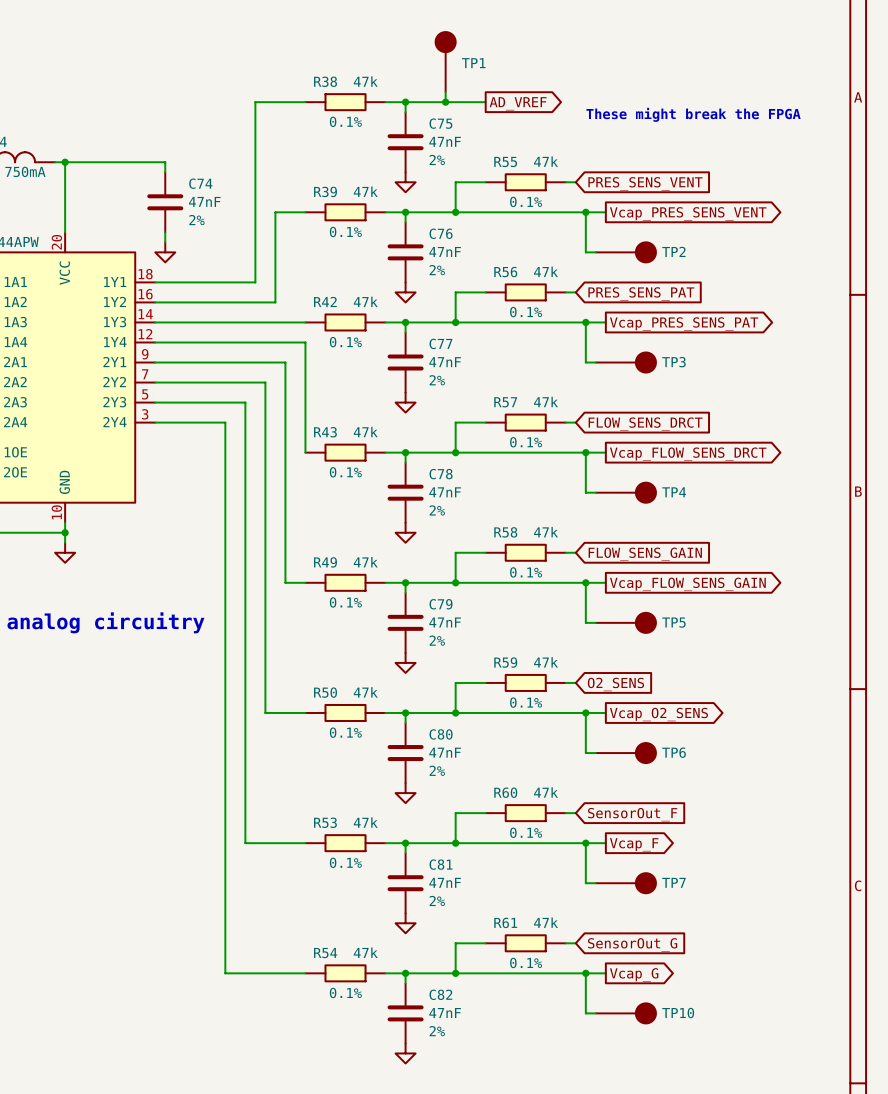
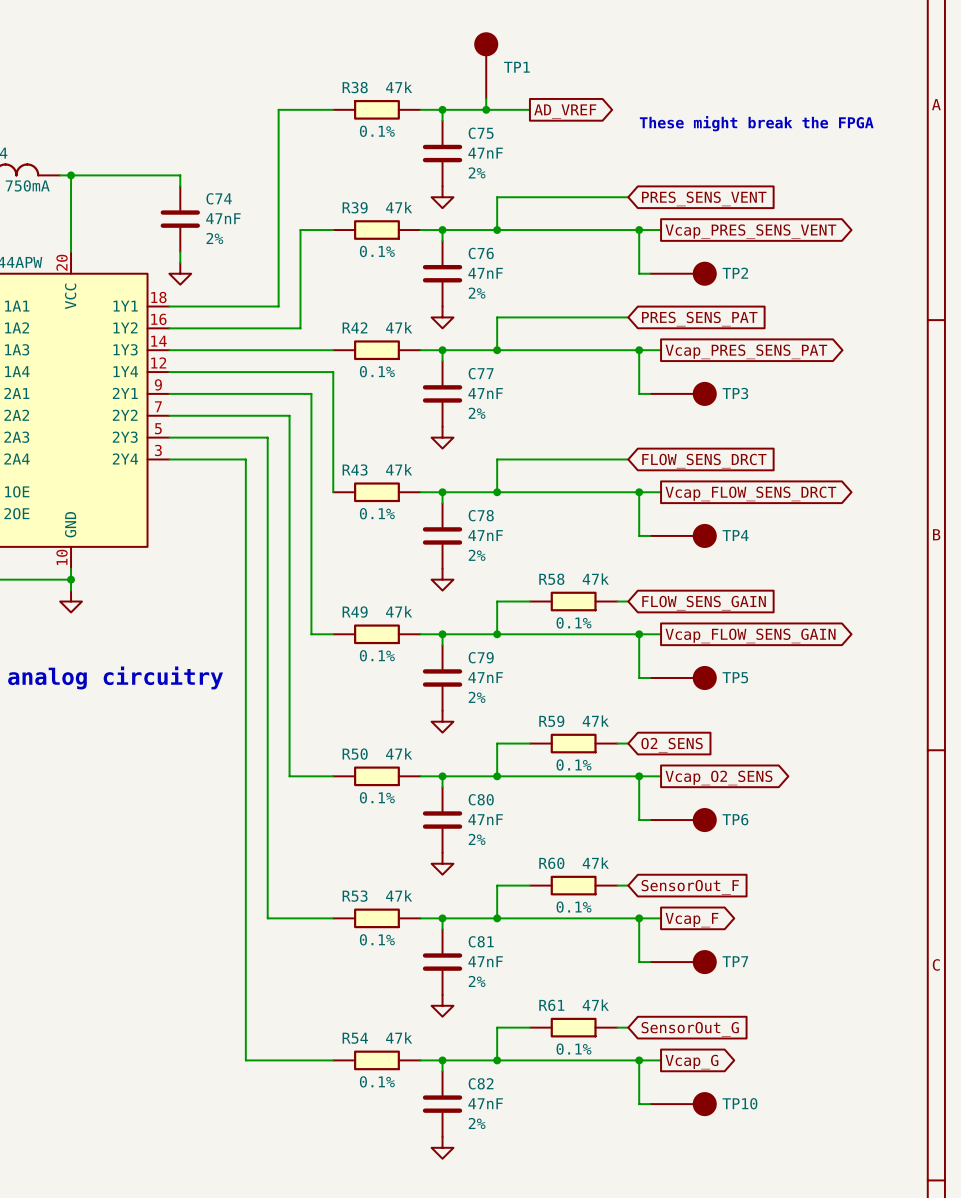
R55: (525, 182) -> none
R56: (525, 292) -> none
R57: (525, 422) -> none

